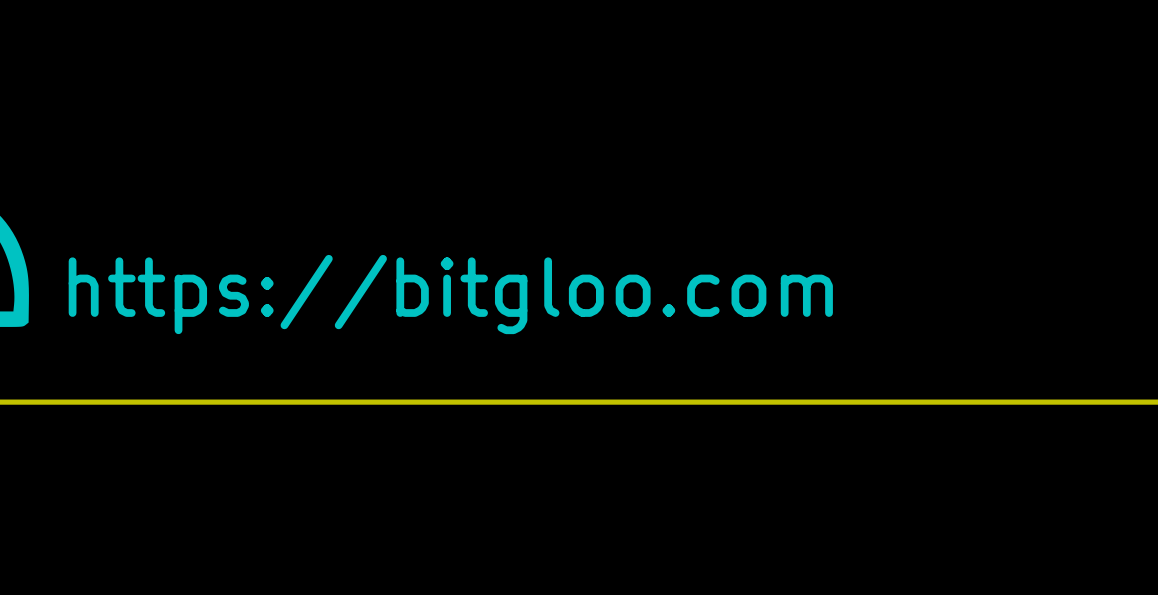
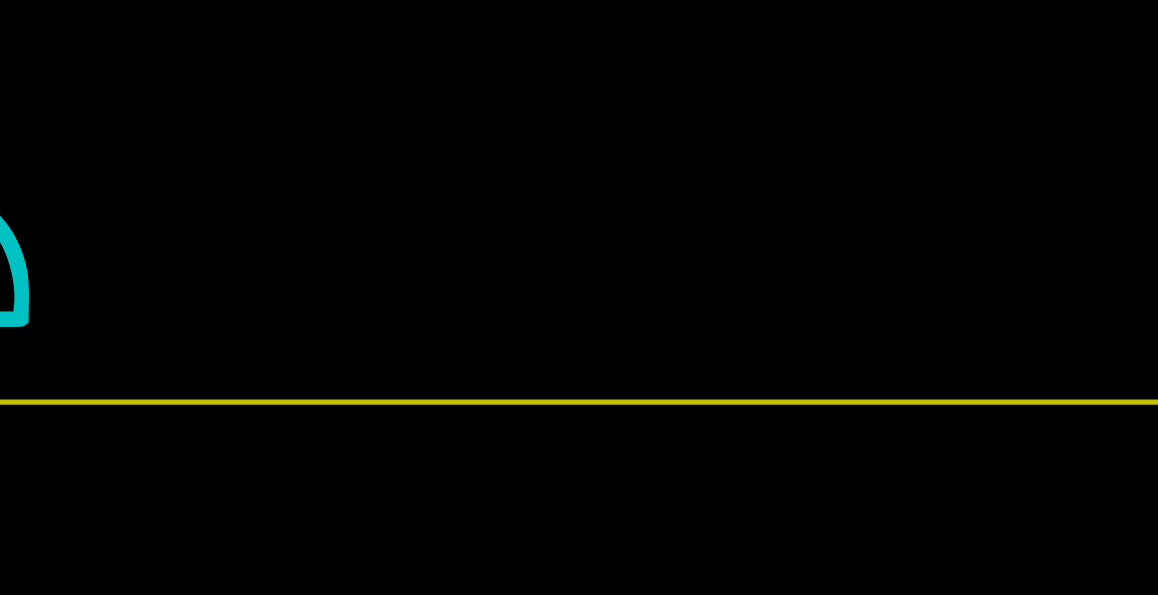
text: https://bitgloo.com (450, 294) -> none

